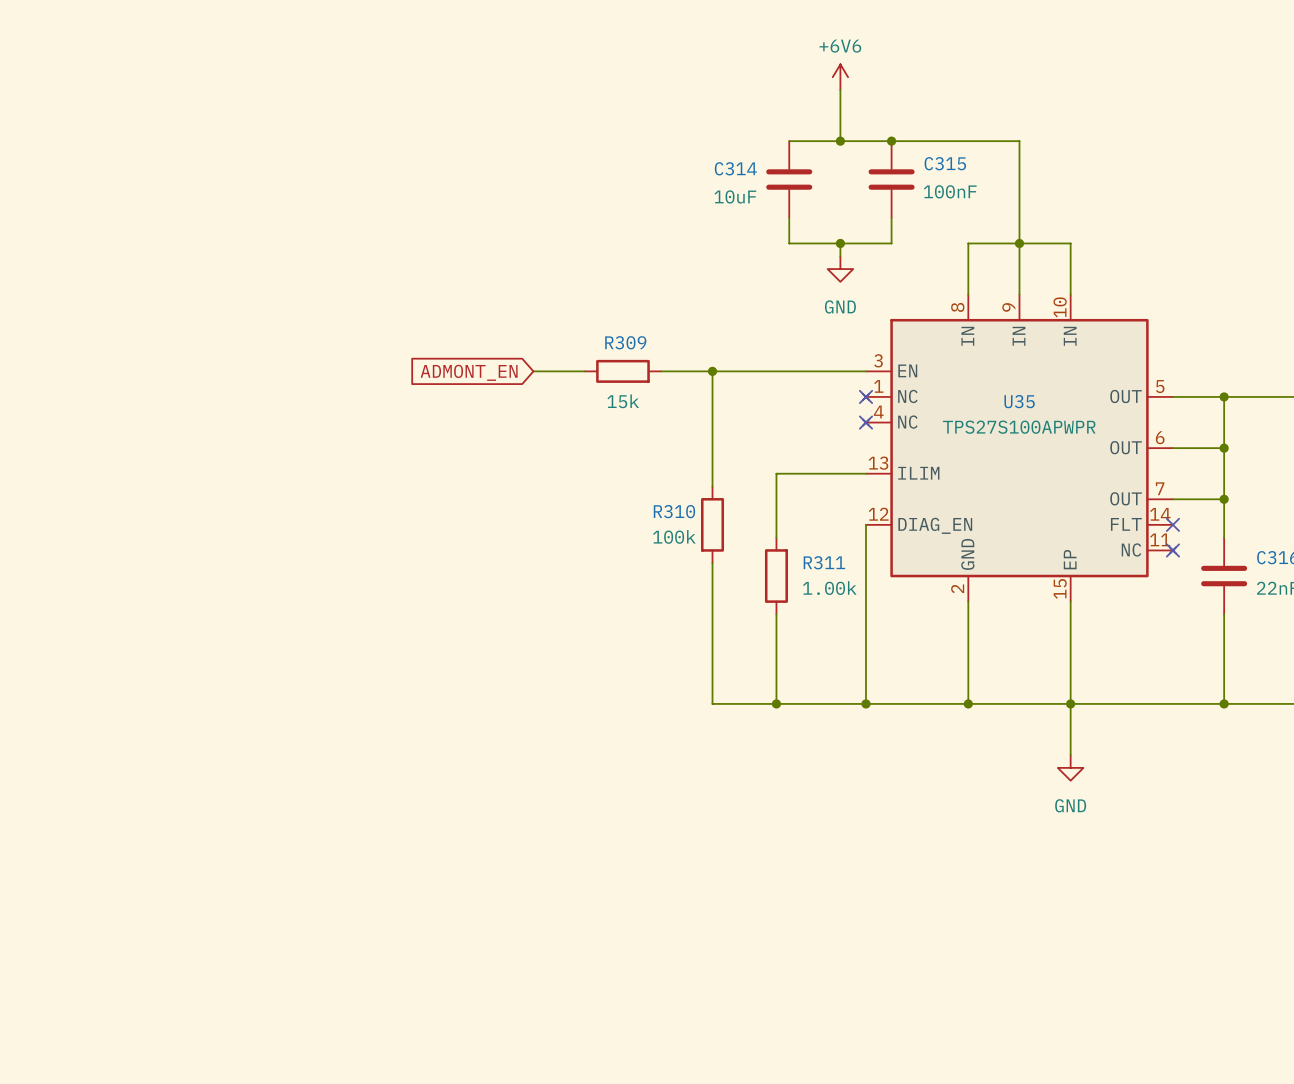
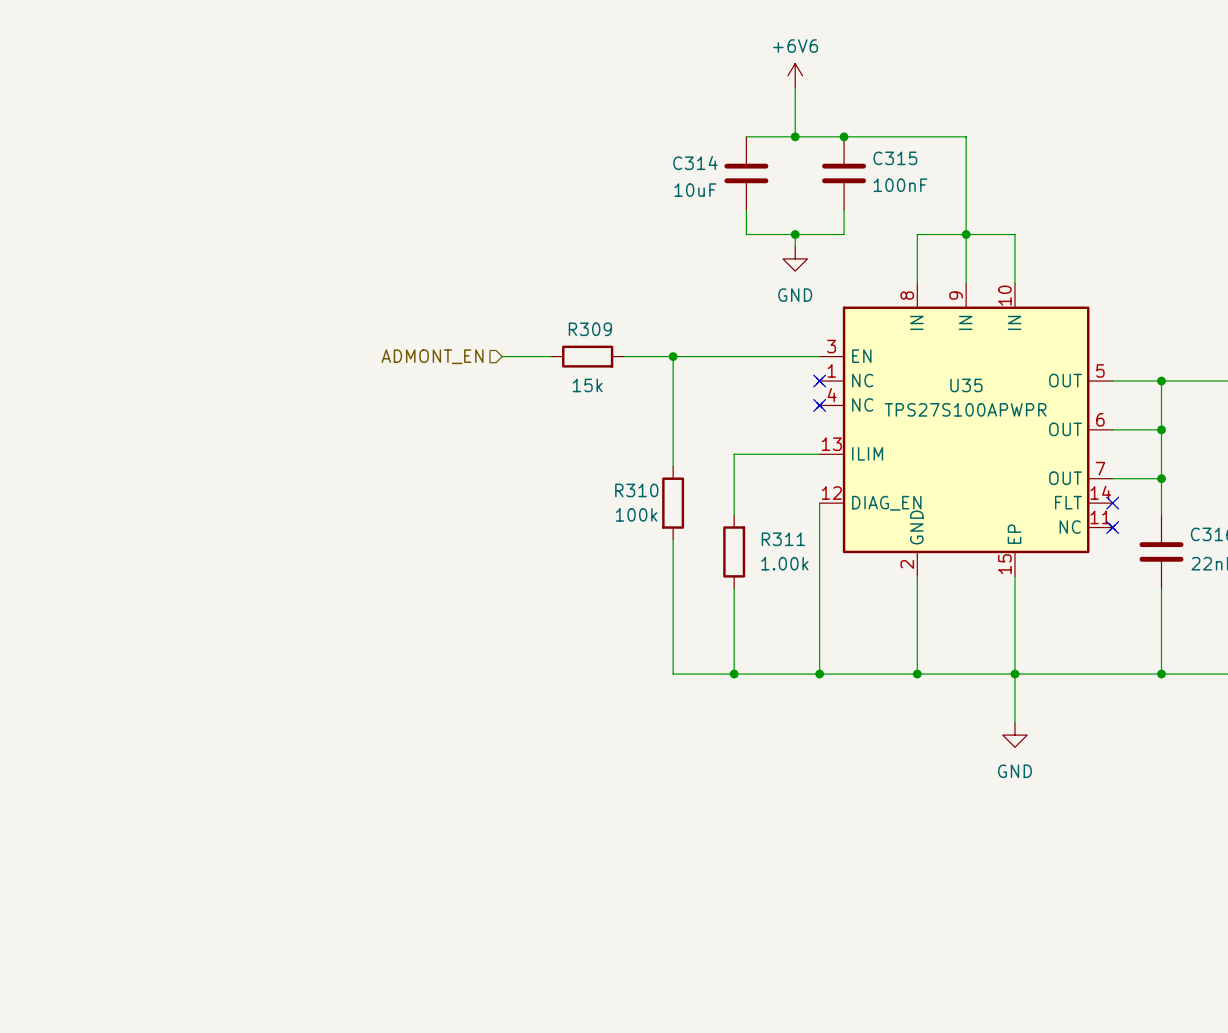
hierarchical label: none -> ADMONT_EN (432, 356)
global label: ADMONT_EN (469, 372) -> none

